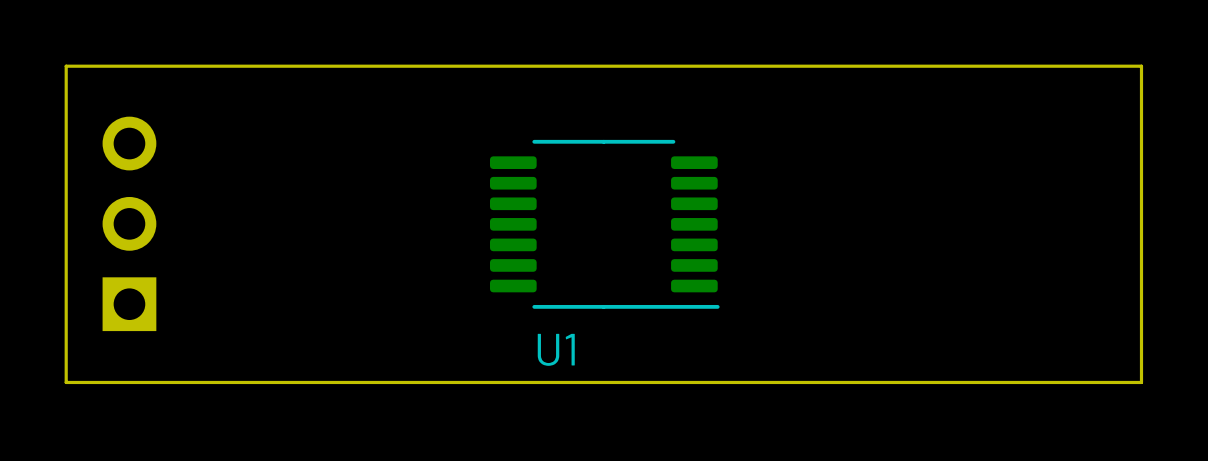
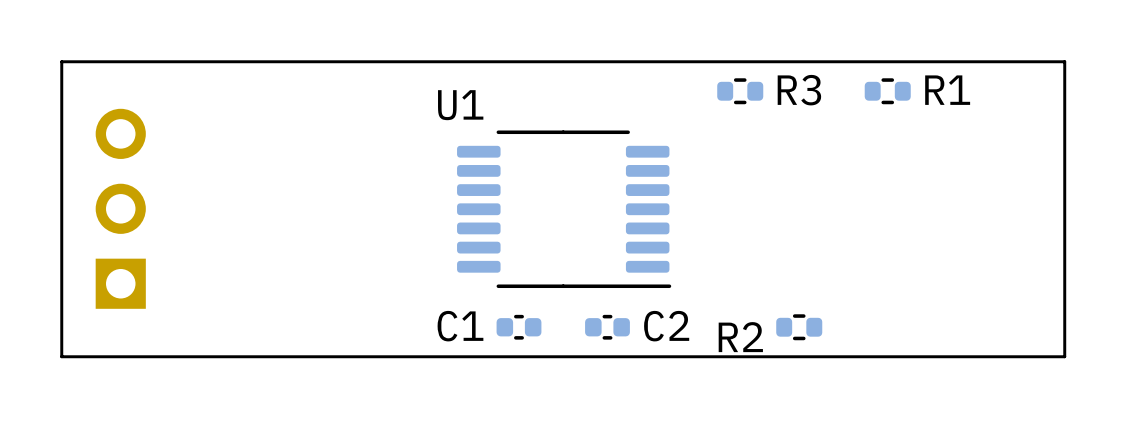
R3: none -> (740, 91)
R1: none -> (887, 91)
U1 name position: U1 (556, 349) -> U1 (460, 105)
C1: none -> (518, 327)
C2: none -> (607, 327)
R2: none -> (799, 327)

